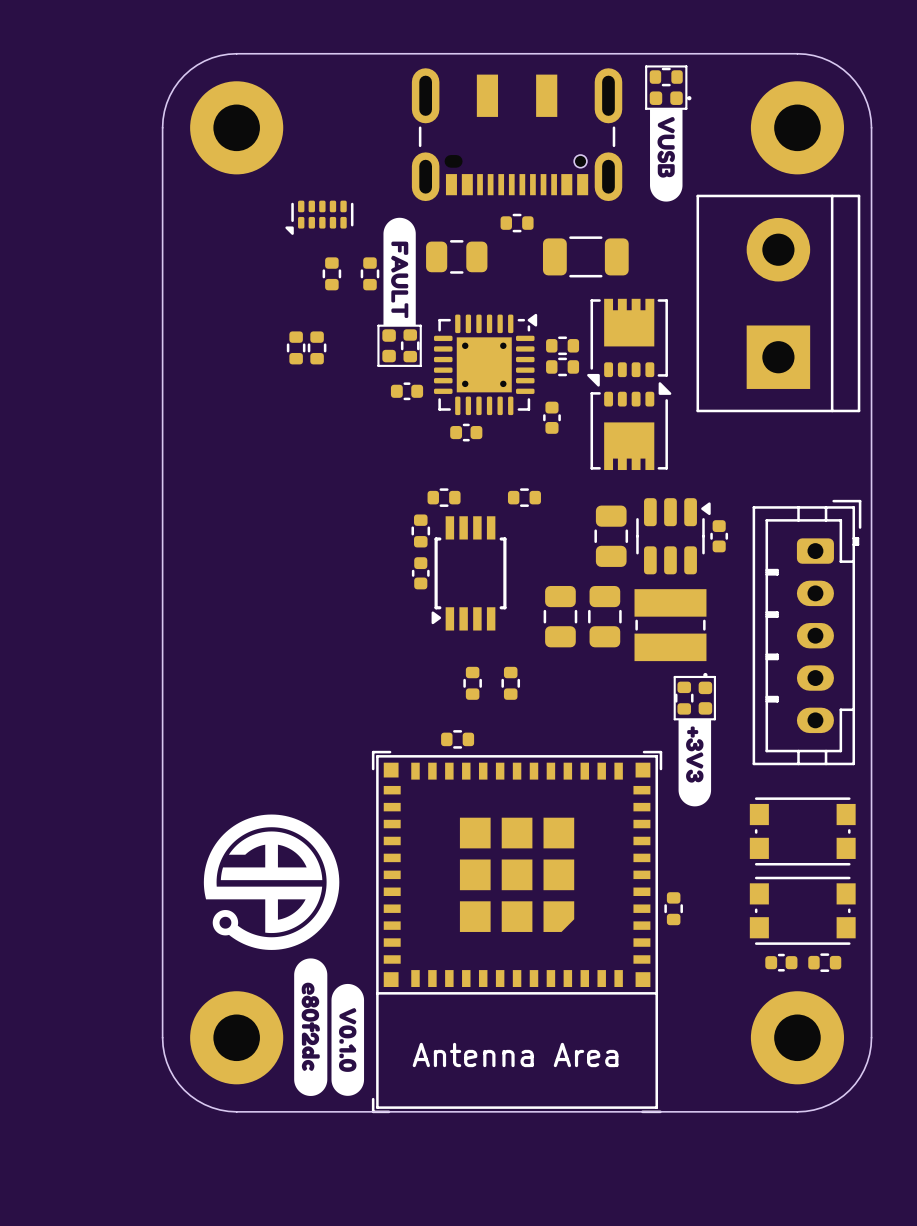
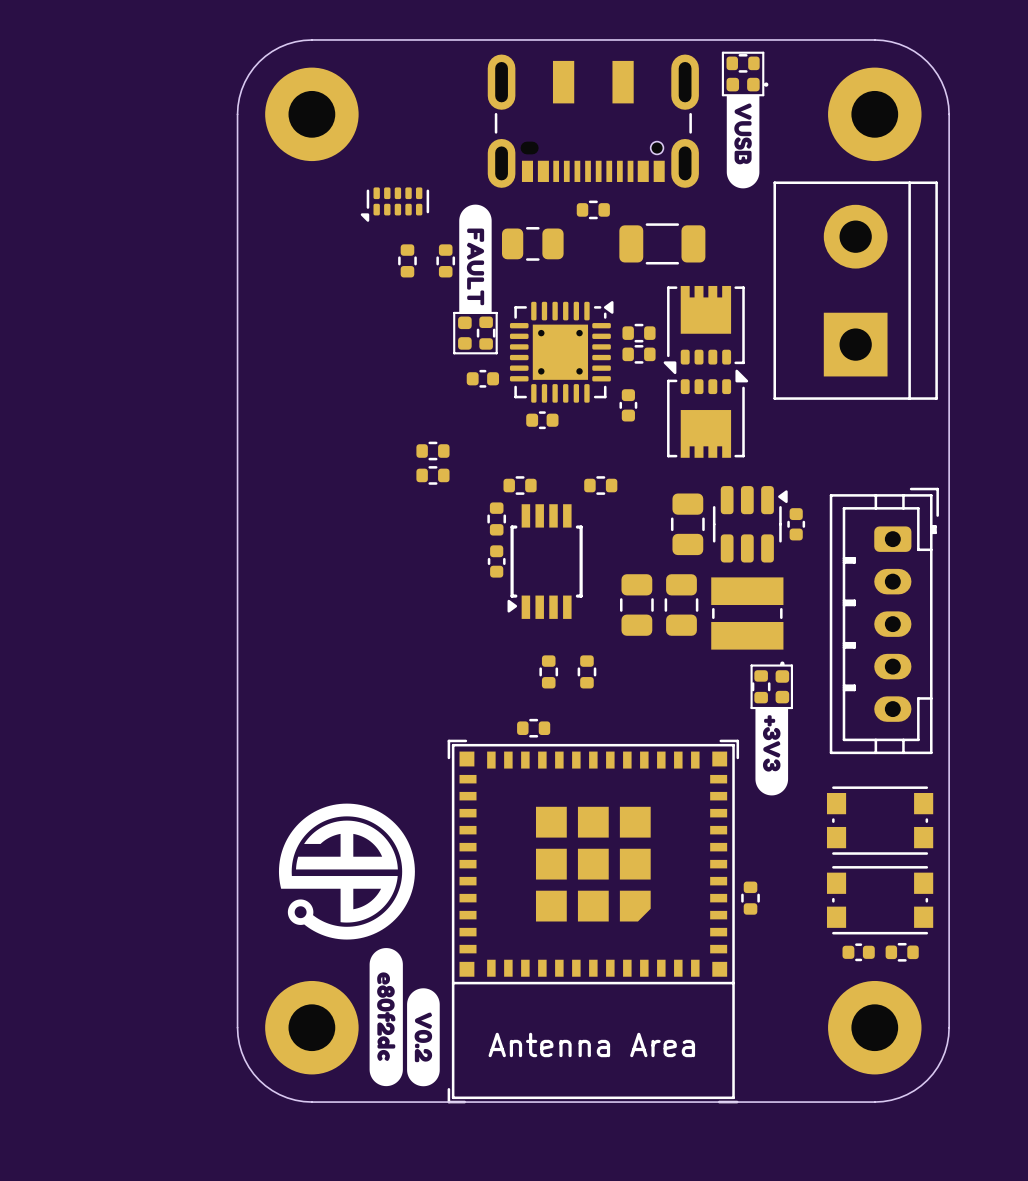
part: (296, 347) -> none
part: (317, 347) -> none
part: none -> (432, 451)
part: none -> (432, 475)
drawing shape: [331, 983, 365, 1096] -> [407, 988, 440, 1087]

